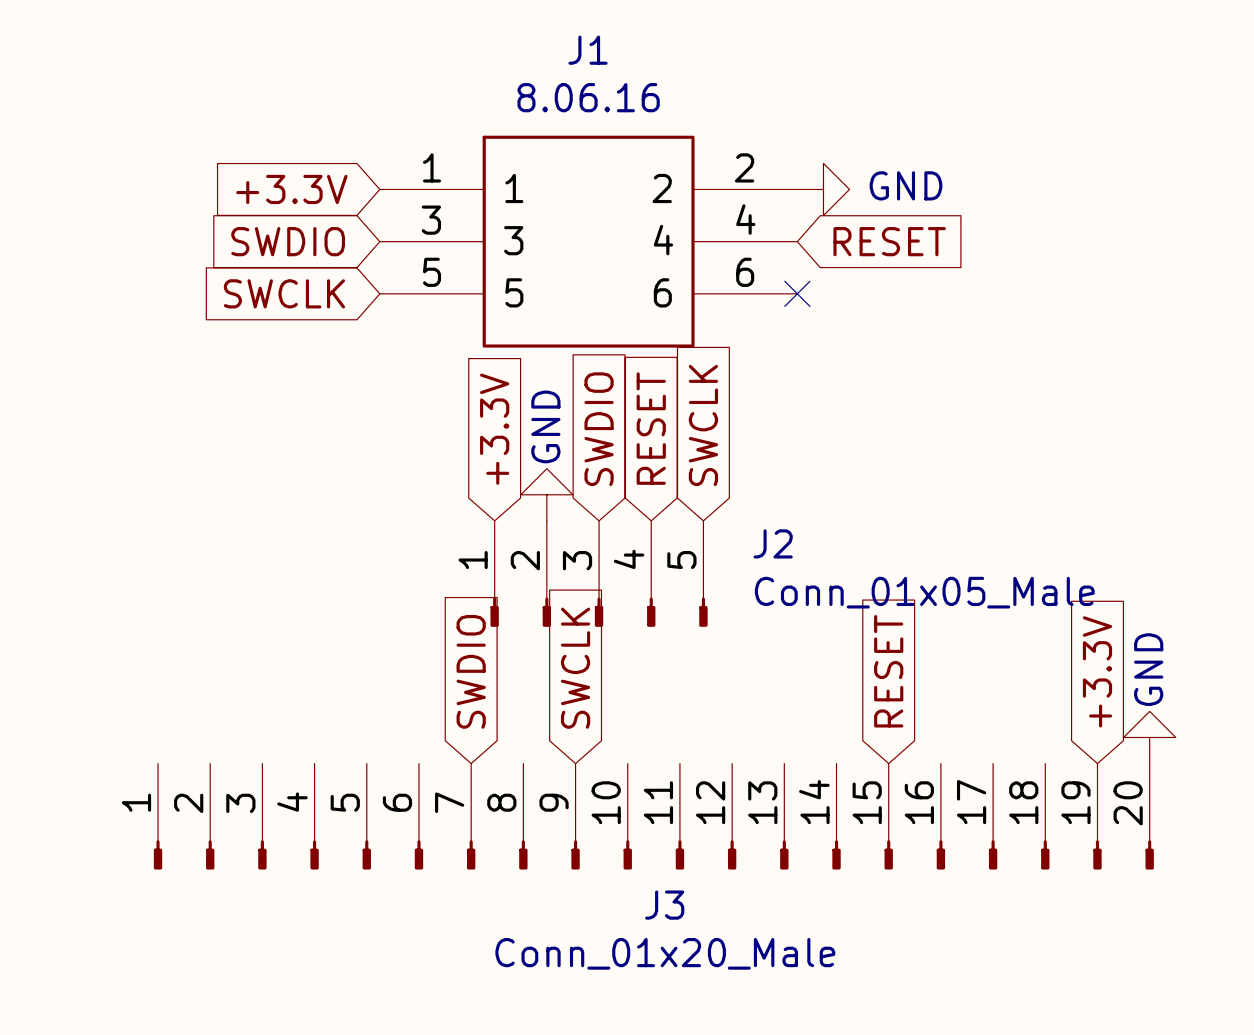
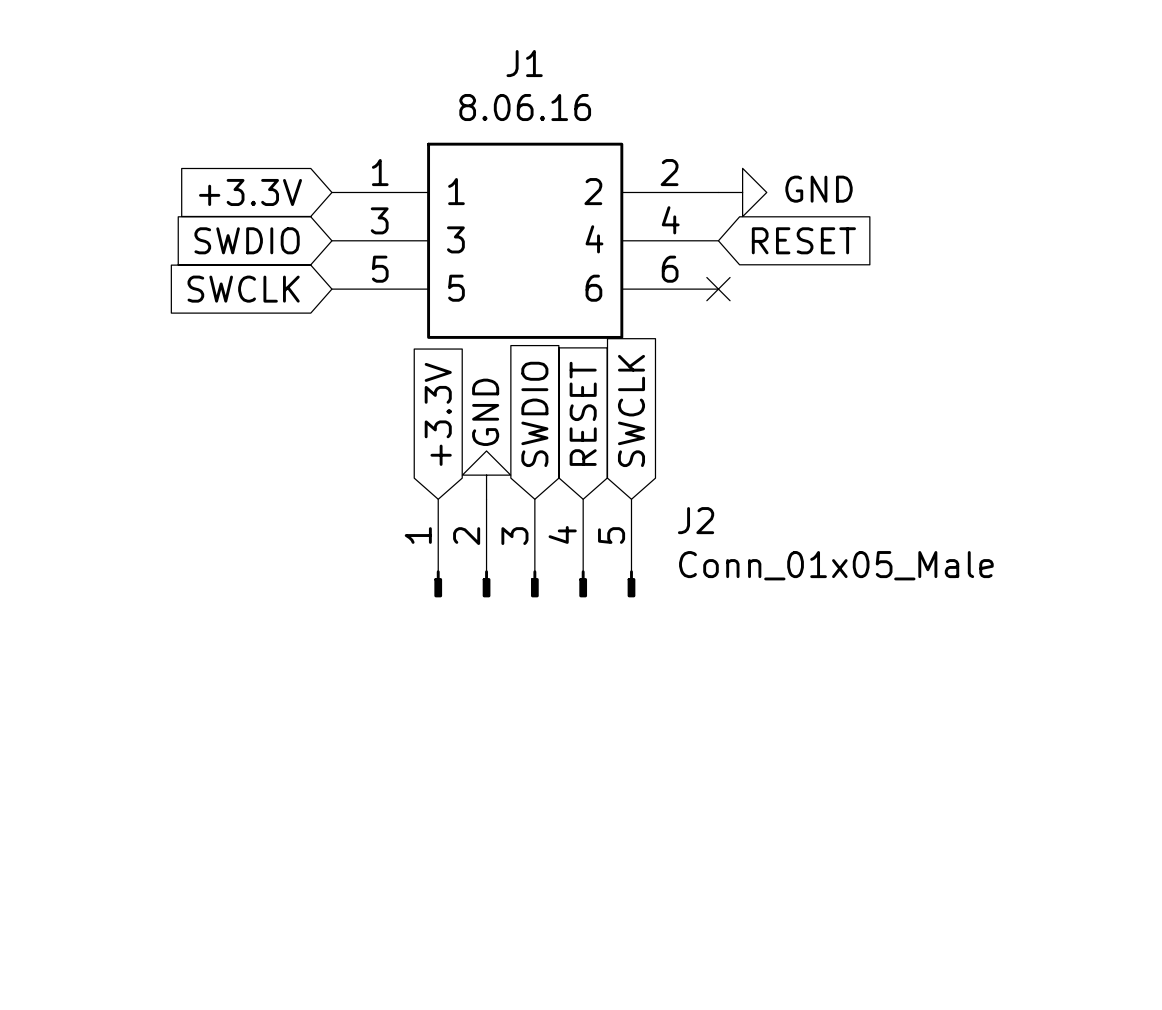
global label: SWCLK (575, 668) -> none
global label: SWDIO (471, 671) -> none
global label: RESET (888, 671) -> none
global label: +3.3V (1097, 671) -> none
power symbol: GND (1149, 737) -> none
J3: Conn_01x20_Male (653, 816) -> none

